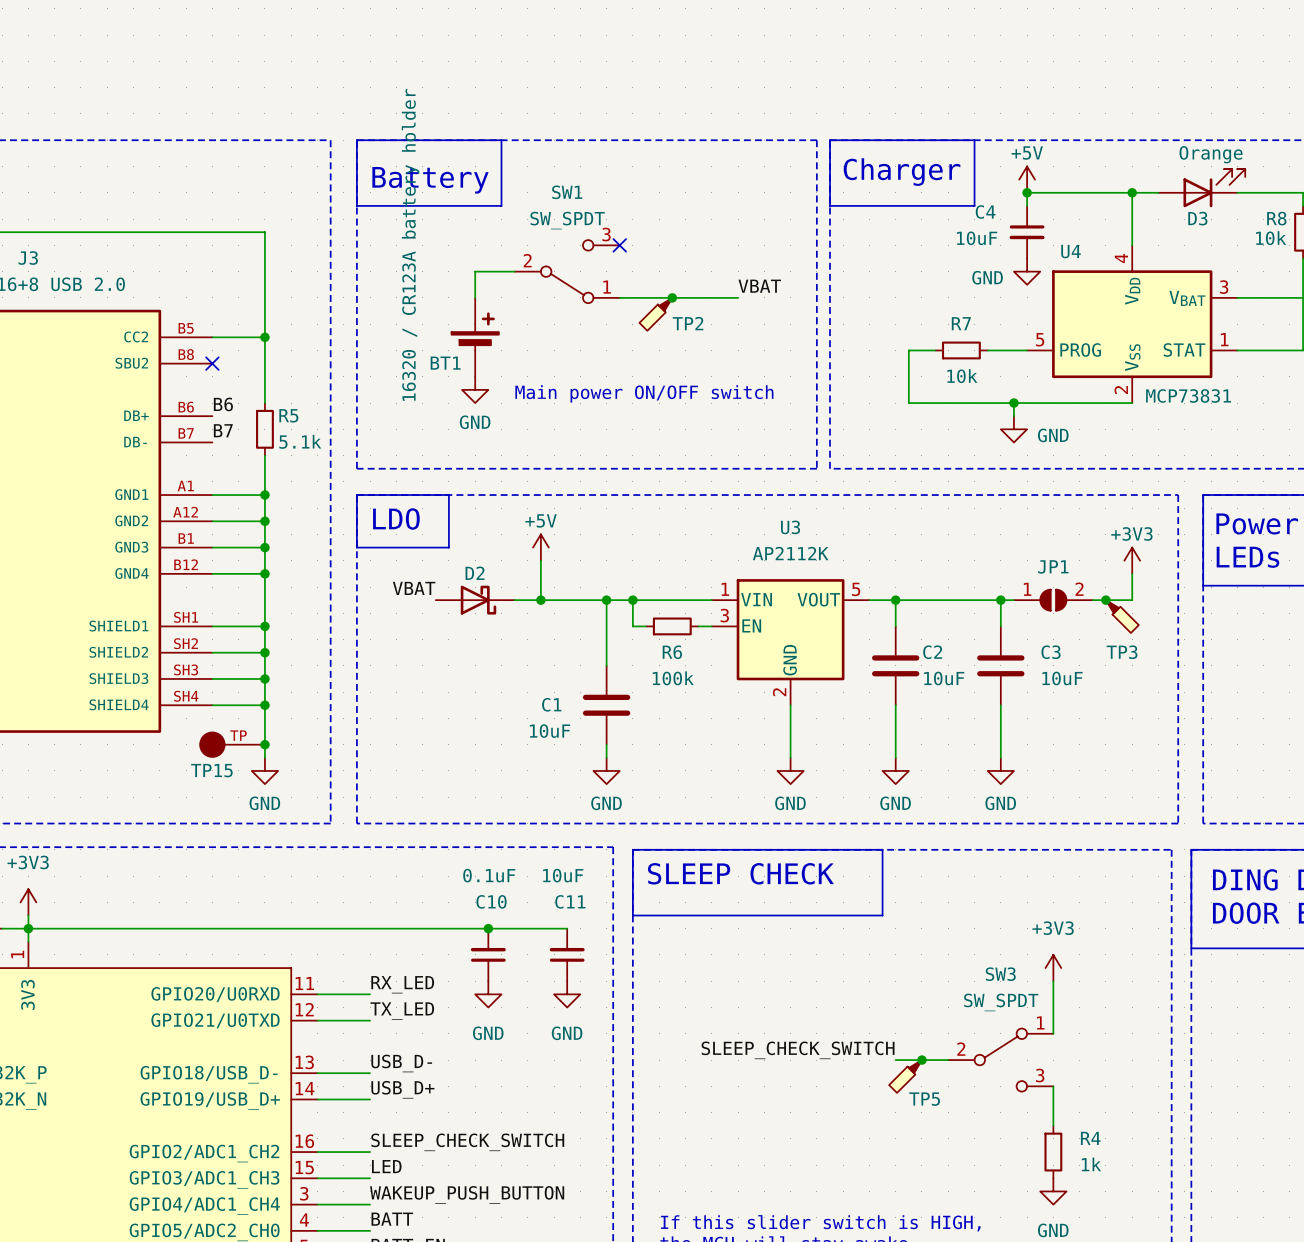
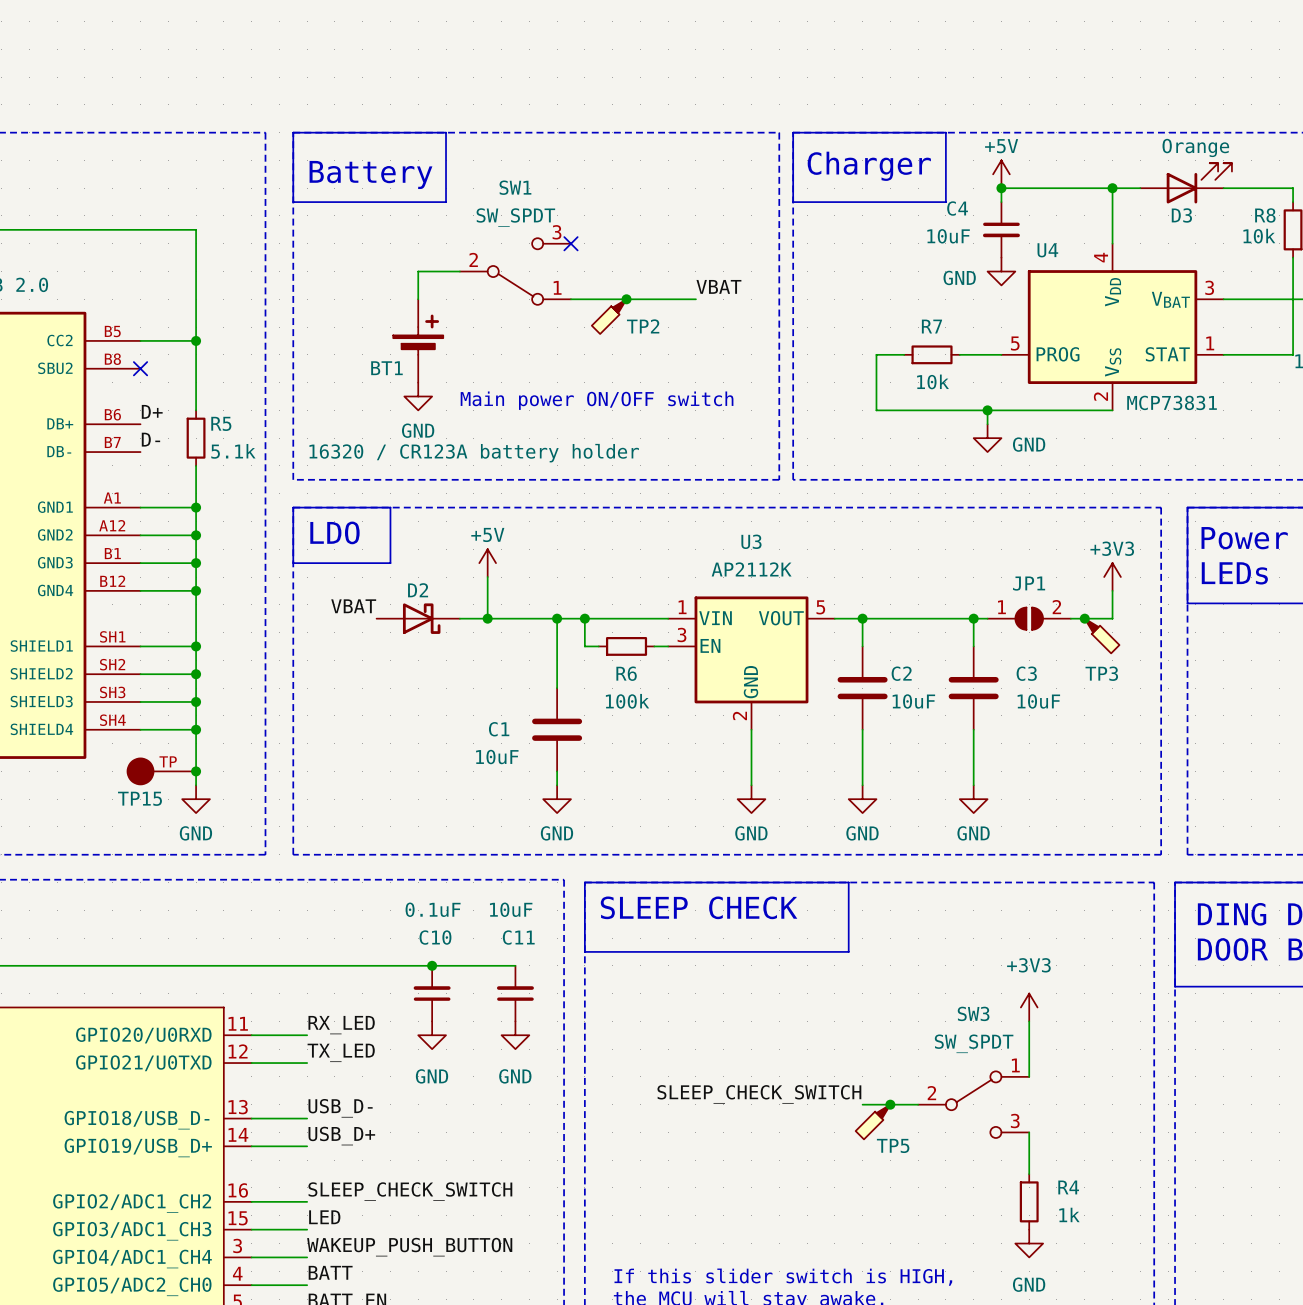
BT1 value rotation: 0° (410, 244) -> 90° clockwise (474, 453)
label: B6 (223, 404) -> D+ (152, 411)
label: B7 (223, 430) -> D- (150, 439)

